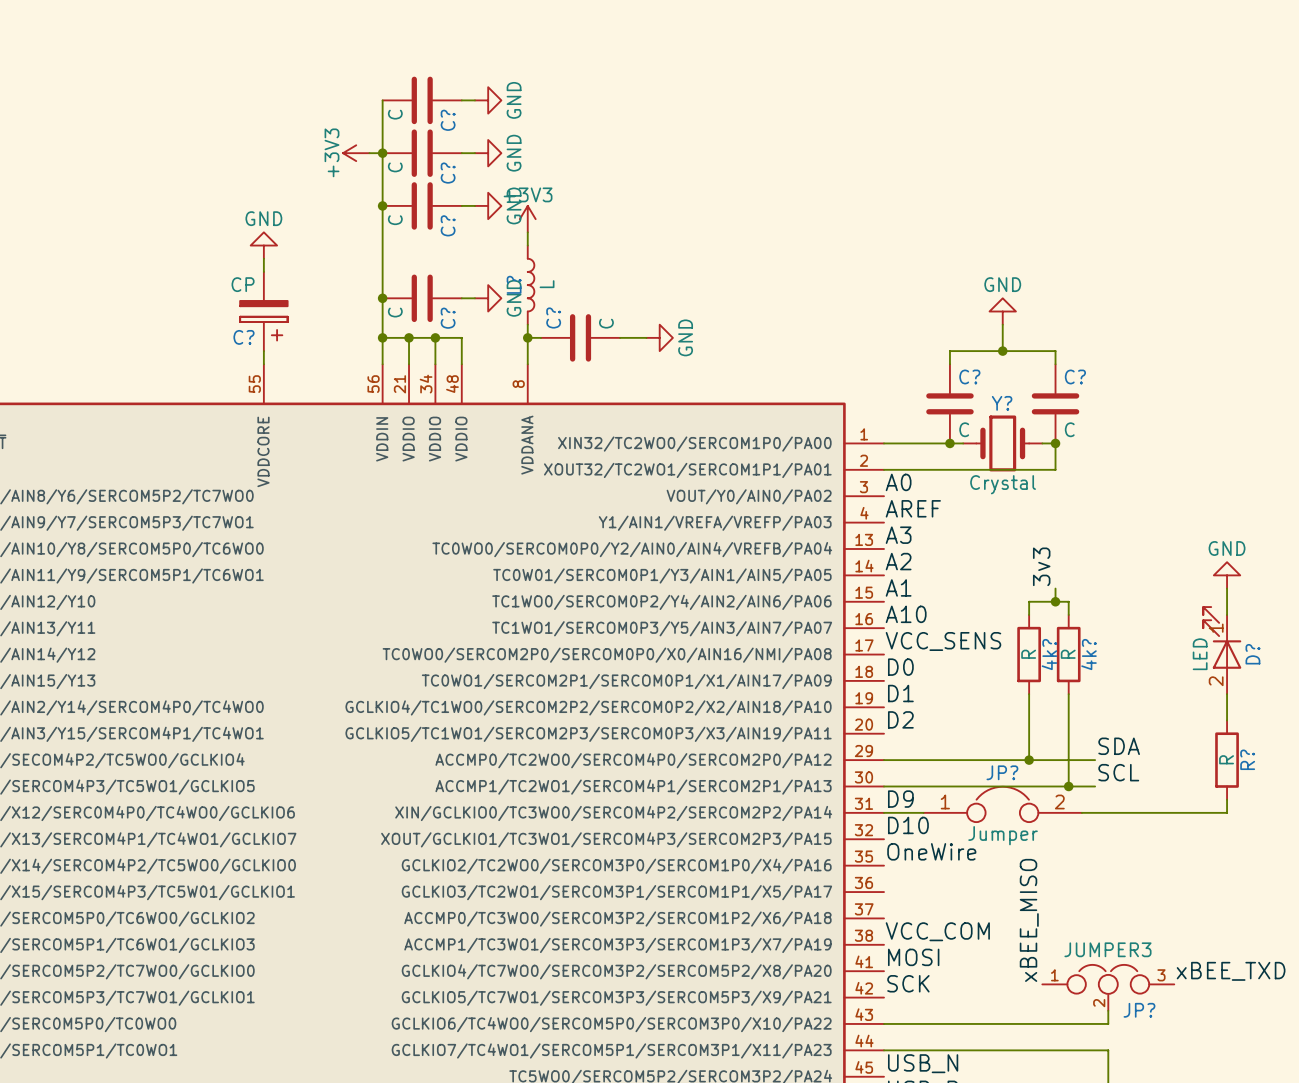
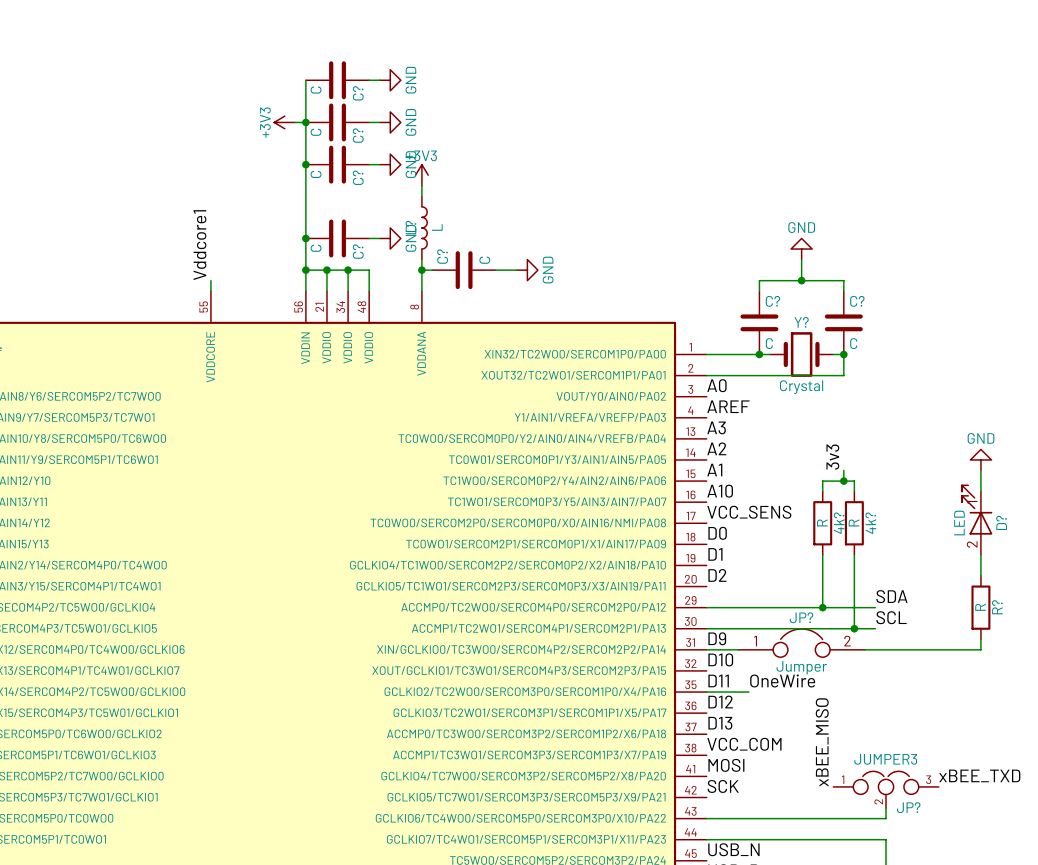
power symbol: GND (263, 245) -> none
wire: (263, 258) (263, 271) -> none
label: none -> Vddcore1 (200, 245)
C?: CP (263, 311) -> none
label: OneWire (931, 851) -> D11 (718, 680)
label: none -> OneWire (782, 680)
wire: none -> (706, 692) (748, 692)
label: none -> D12 (720, 702)
label: none -> D13 (720, 723)

